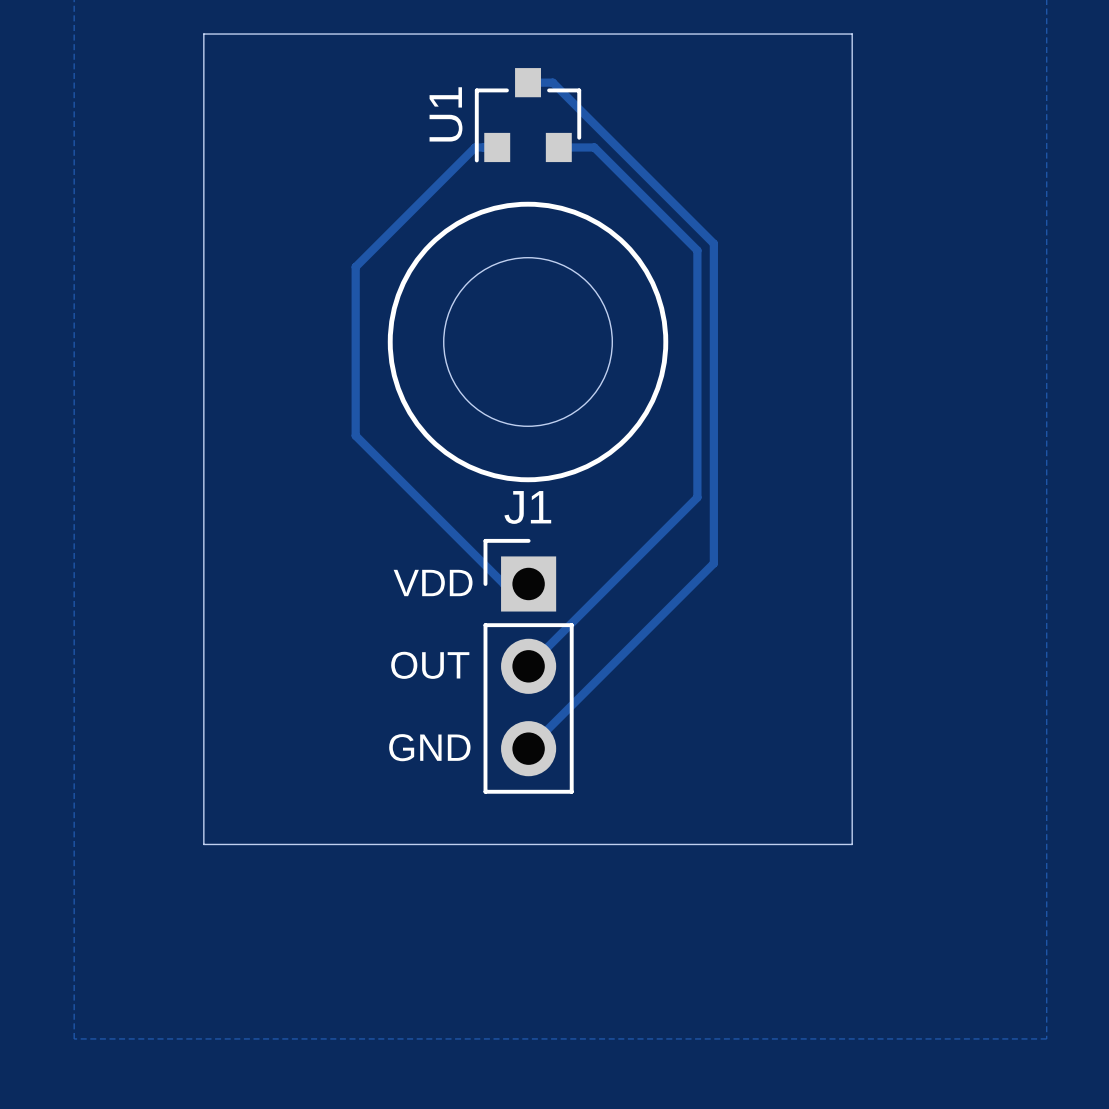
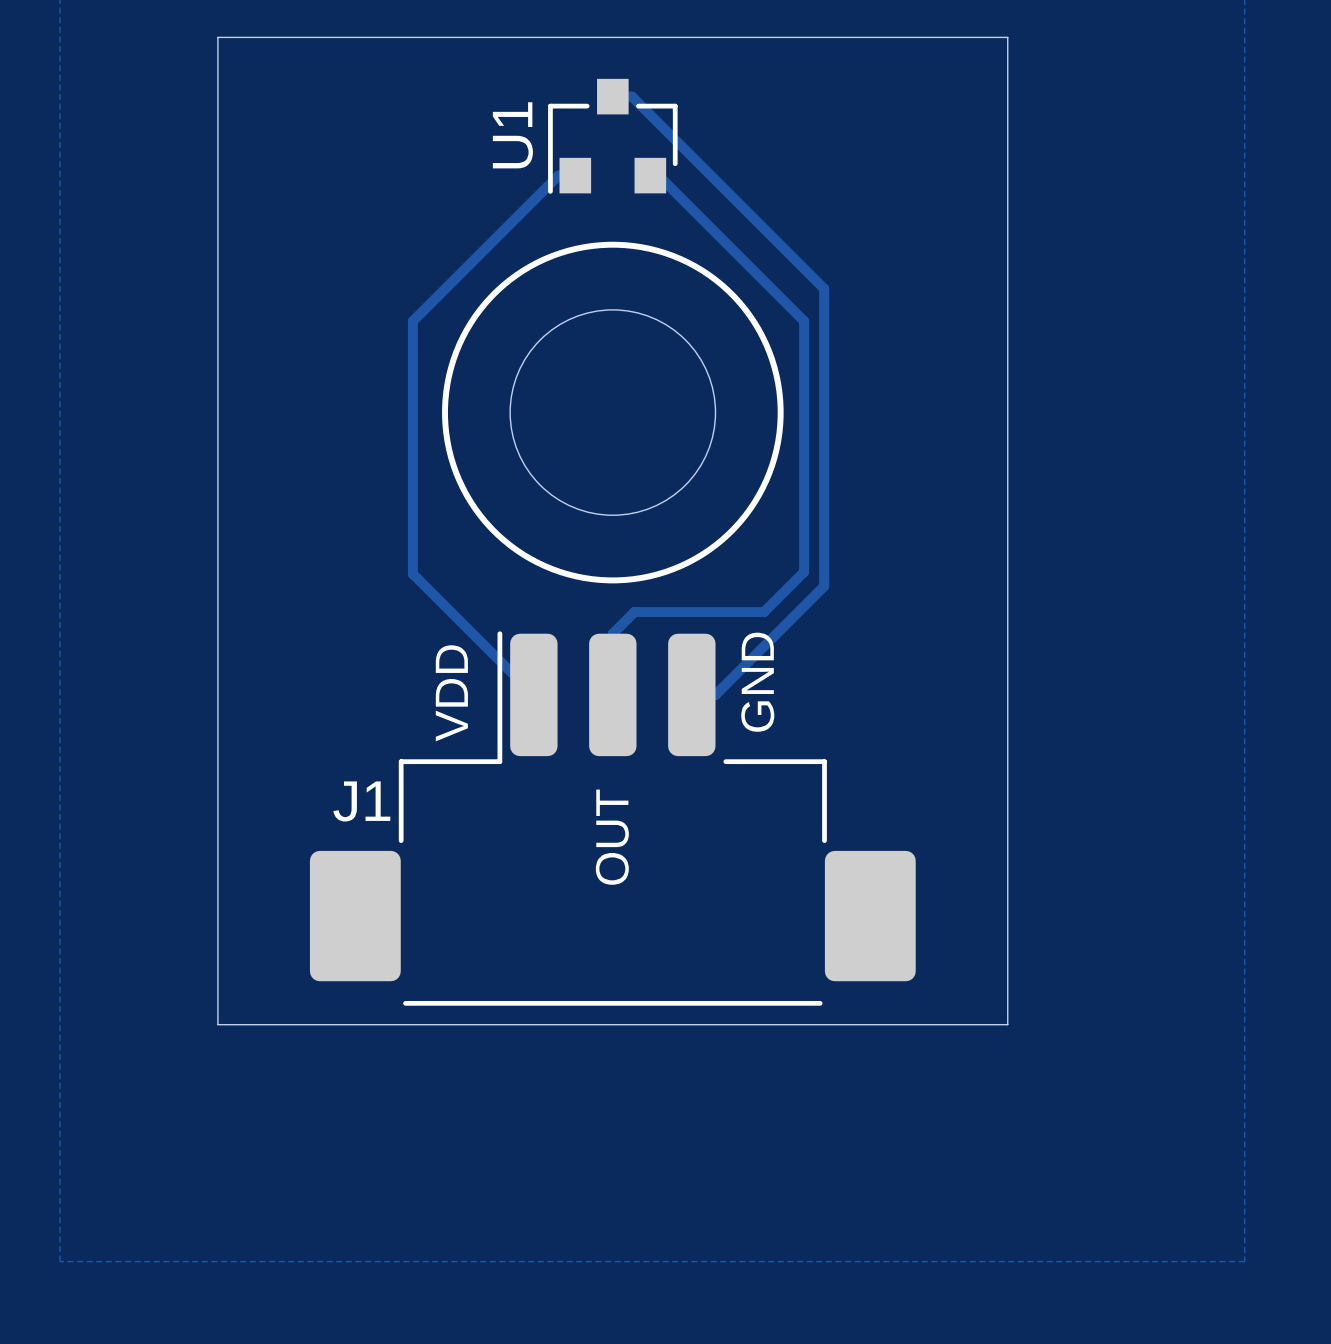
track: (543, 82) (552, 82) (713, 243) (713, 563) (528, 748) -> (632, 96) (824, 288) (824, 586) (715, 694) (691, 694)
track: (483, 147) (475, 147) (355, 266) (355, 435) (503, 583) (528, 583) -> (558, 175) (412, 321) (412, 574) (533, 694)
track: (565, 147) (594, 147) (697, 250) (697, 497) (528, 666) -> (658, 175) (804, 321) (804, 571) (764, 612) (634, 612) (612, 633) (612, 694)
J1 name position: J1 (527, 507) -> J1 (361, 801)
J1 footprint: [483, 538, 574, 794] -> [309, 631, 916, 1006]
text rotation: 0° (433, 583) -> 90° counterclockwise (451, 693)
text rotation: 0° (430, 665) -> 90° counterclockwise (612, 837)
text position: OUT (430, 665) -> OUT (612, 837)
text rotation: 0° (429, 747) -> 90° counterclockwise (757, 682)
text position: GND (429, 747) -> GND (757, 682)

